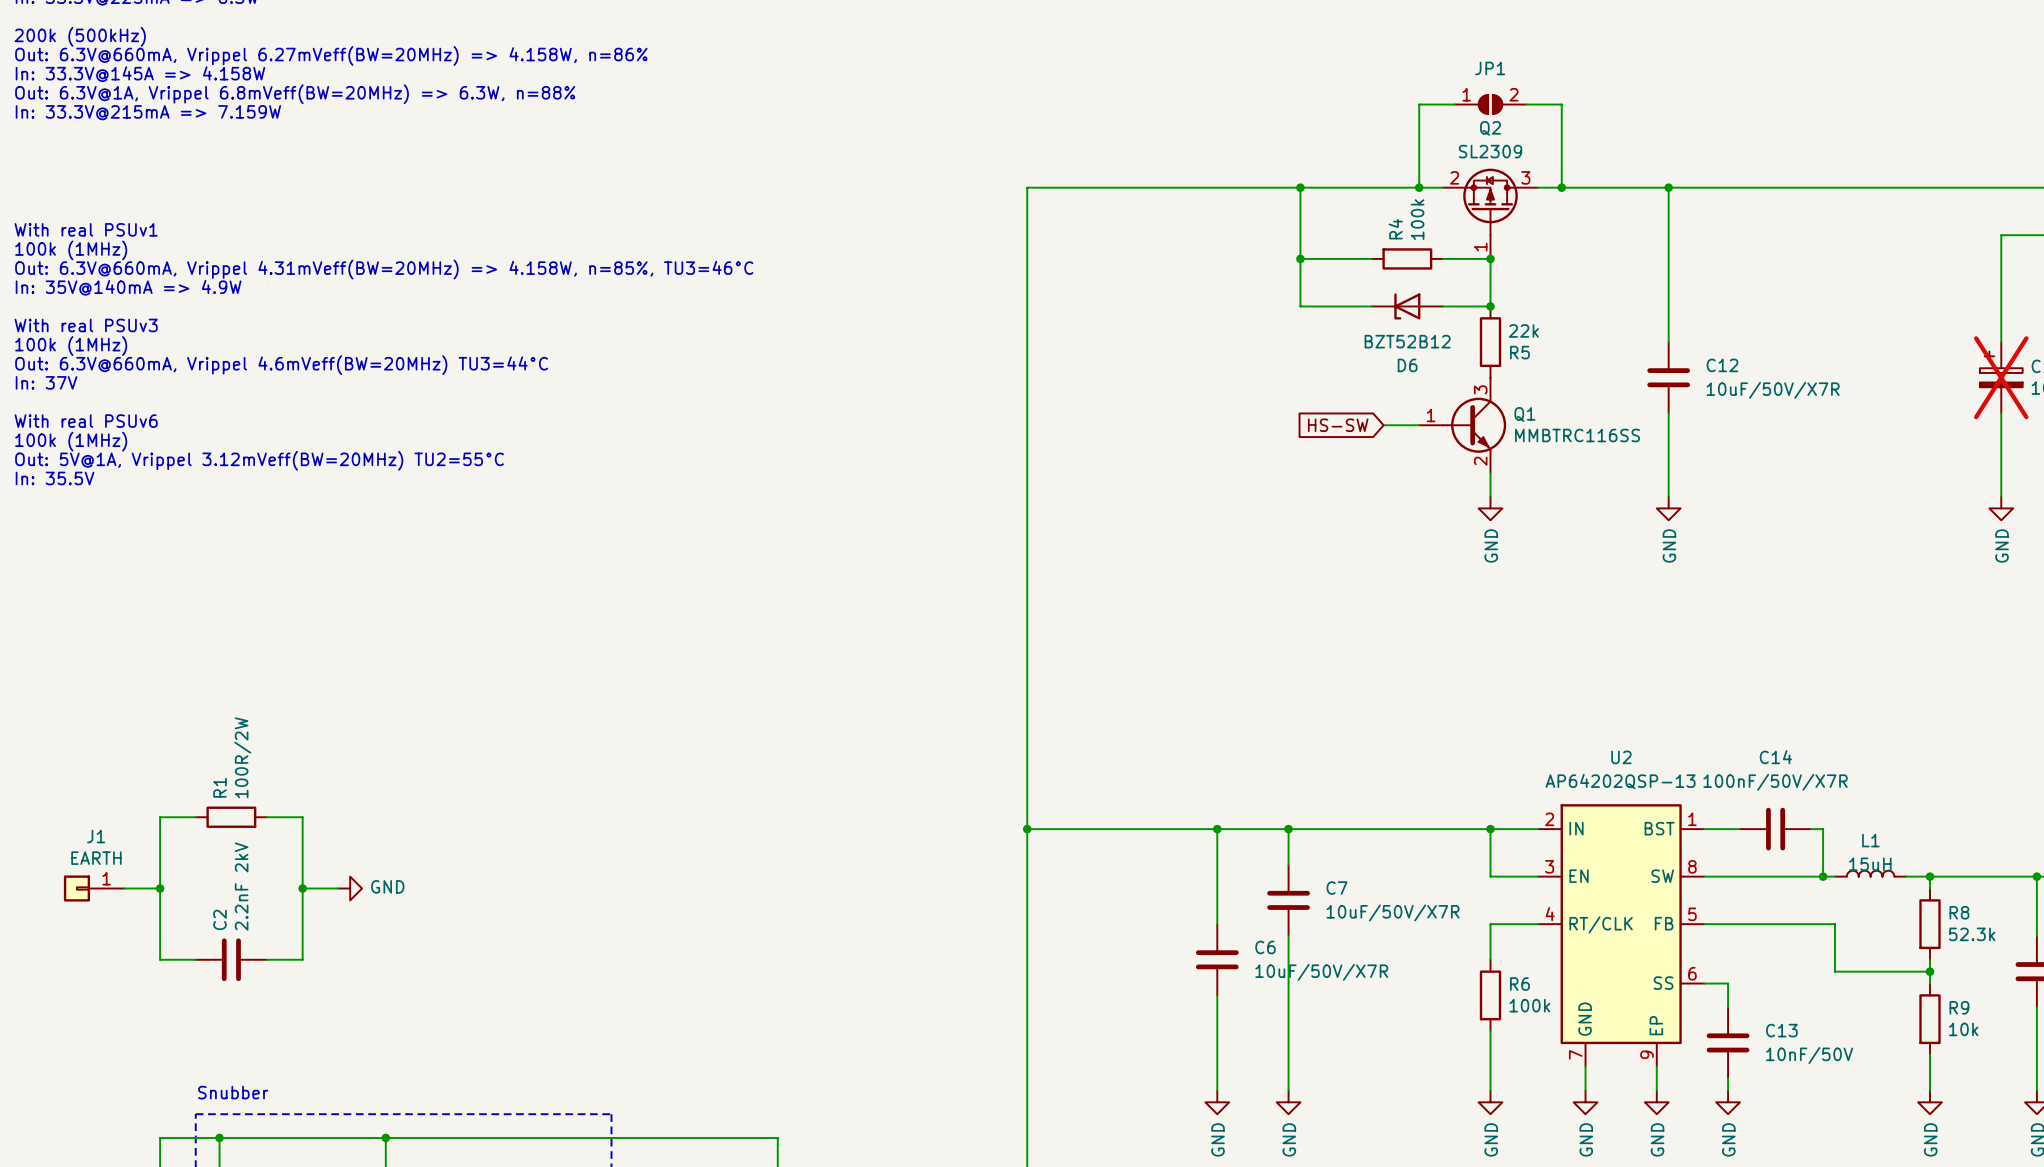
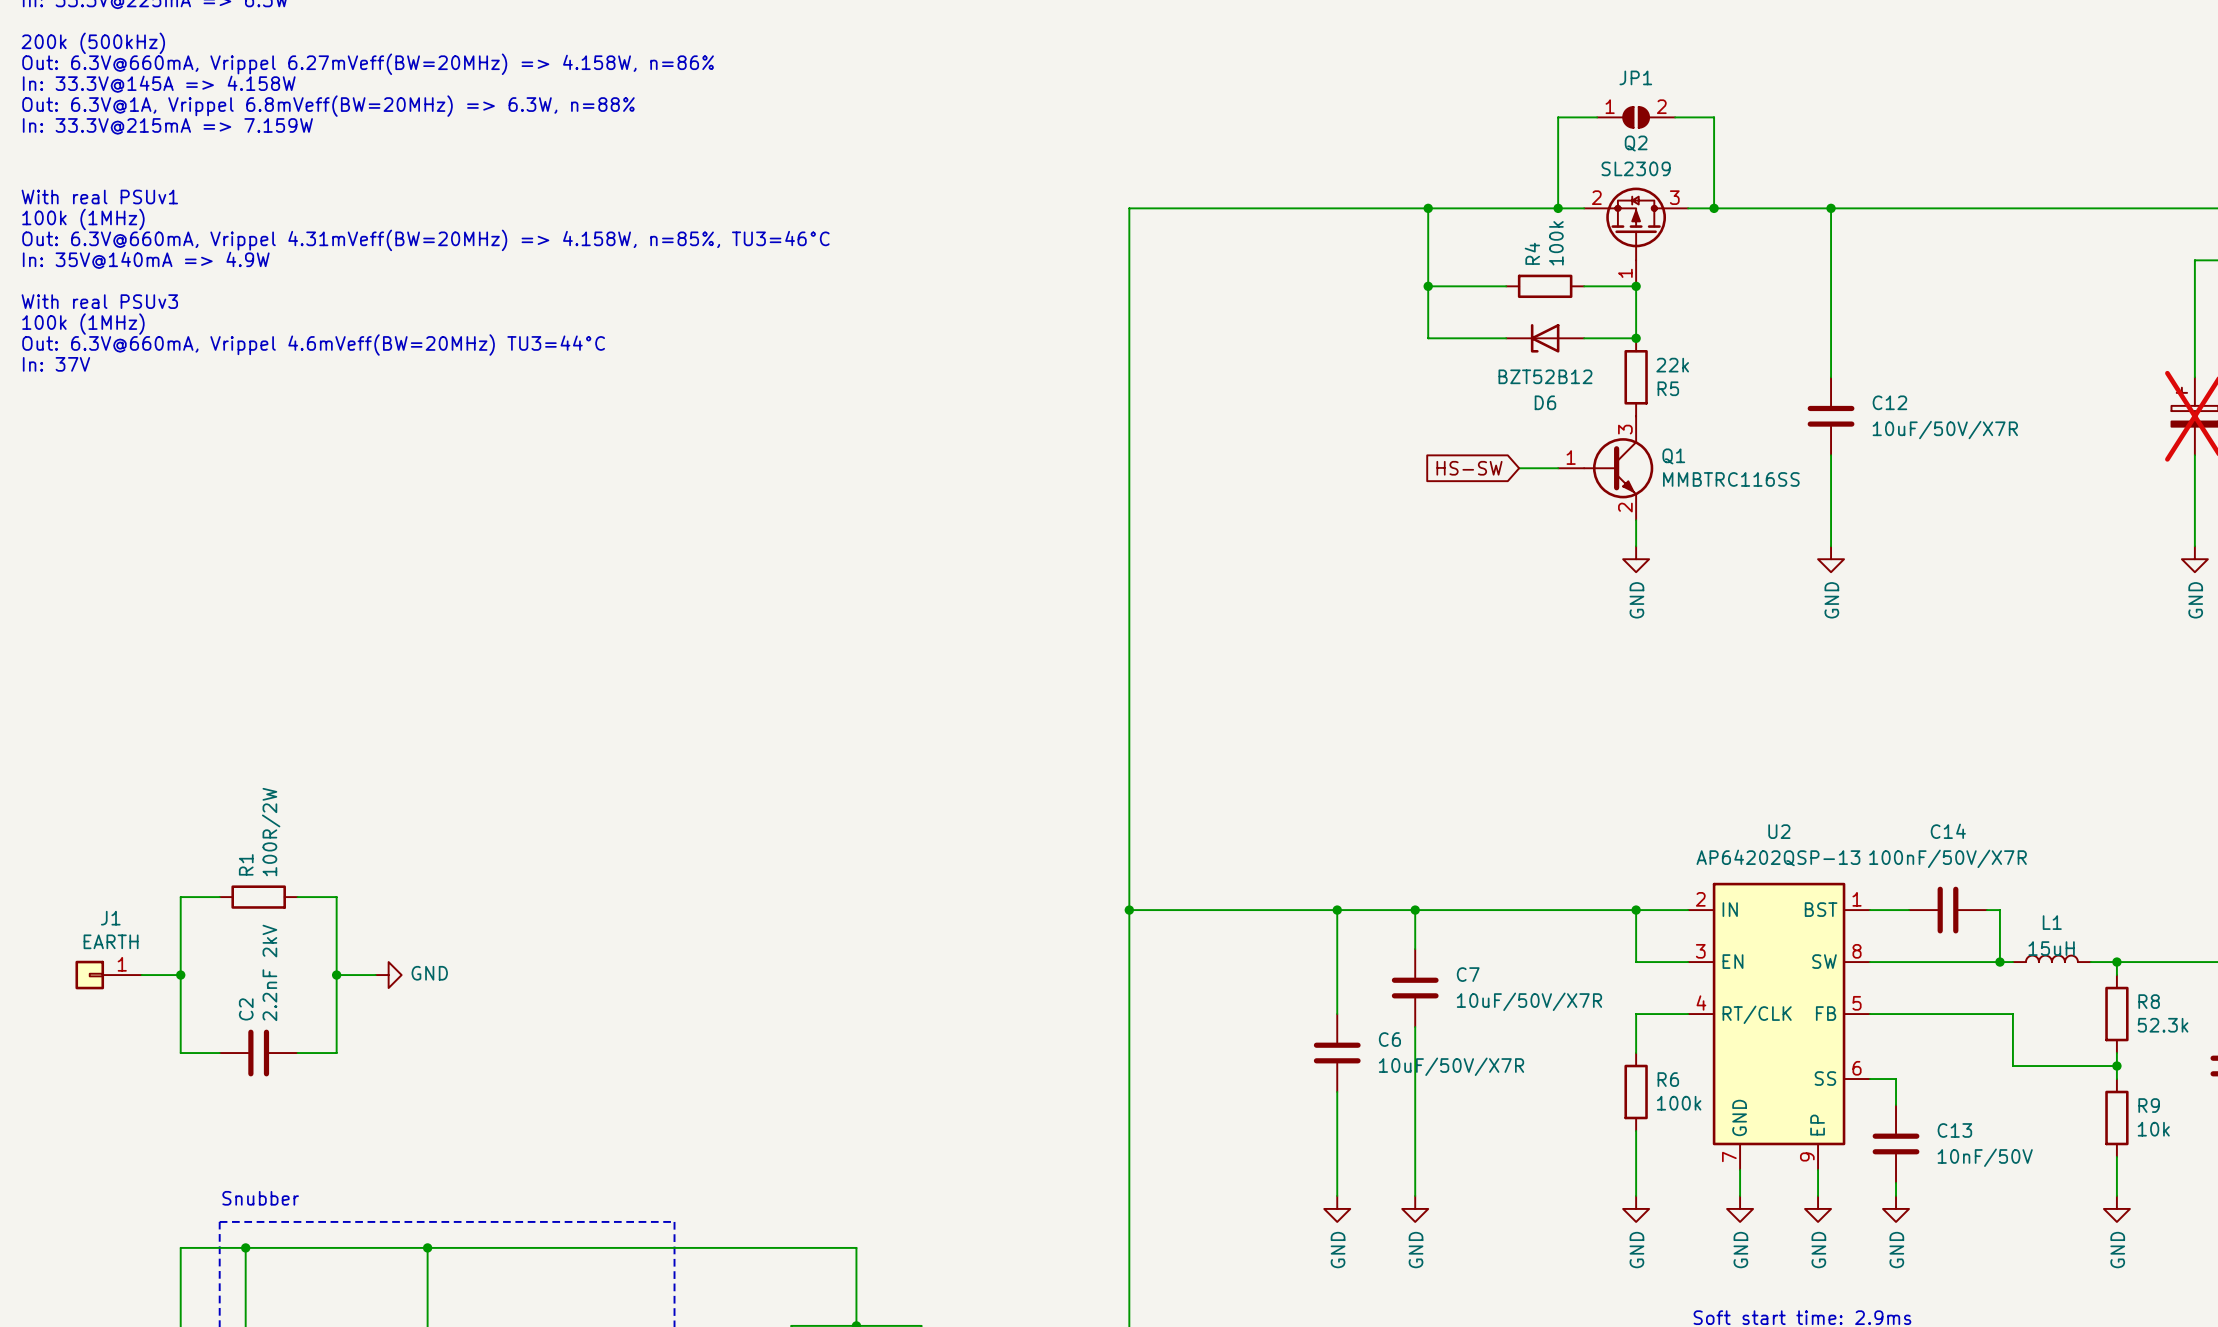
text: none -> 100k (1MHz) (83, 219)
text position: With real PSUv1 (86, 229) -> With real PSUv1 (99, 197)
text: 100k (1MHz) (71, 250) -> none
text position: Out: 6.3V@660mA, Vrippel 4.31mVeff(BW=20MHz) => 4.158W, n=85%, TU3=46°C (384, 269) -> Out: 6.3V@660mA, Vrippel 4.31mVeff(BW=20MHz) => 4.158W, n=85%, TU3=46°C (425, 240)
text position: In: 35V@140mA => 4.9W (128, 287) -> In: 35V@140mA => 4.9W (146, 260)
text: none -> 100k (1MHz) (83, 324)
text position: With real PSUv3 (86, 325) -> With real PSUv3 (99, 301)
text: 100k (1MHz) (71, 346) -> none
text position: Out: 6.3V@660mA, Vrippel 4.6mVeff(BW=20MHz) TU3=44°C (281, 365) -> Out: 6.3V@660mA, Vrippel 4.6mVeff(BW=20MHz) TU3=44°C (313, 345)
text position: In: 37V (46, 382) -> In: 37V (56, 364)
text: With real PSUv6 (86, 421) -> none
text: 100k (1MHz) (71, 441) -> none
text: Out: 5V@1A, Vrippel 3.12mVeff(BW=20MHz) TU2=55°C (259, 460) -> none
text: In: 35.5V (55, 478) -> none

